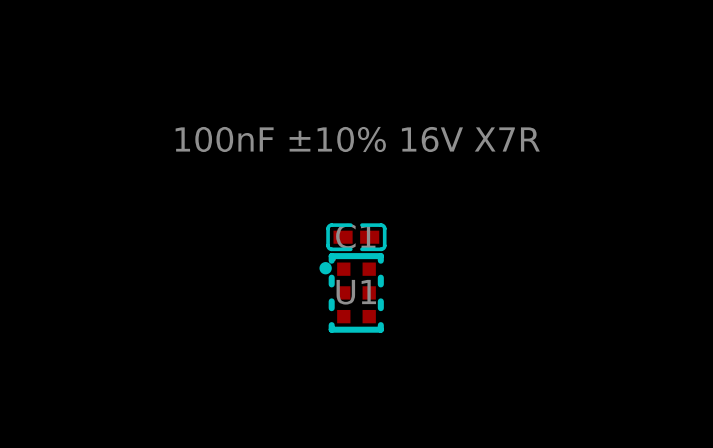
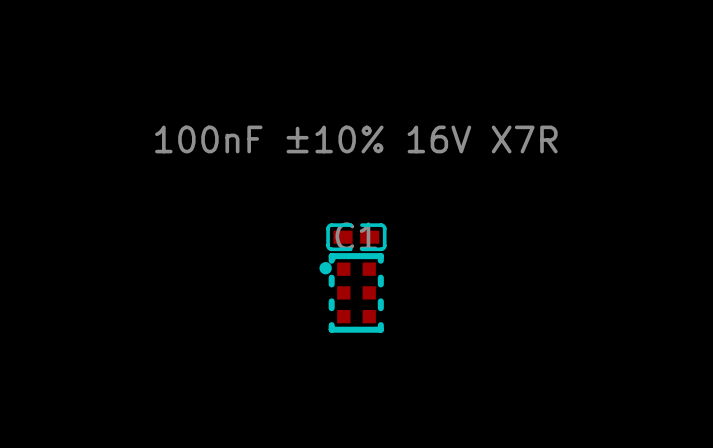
U1 name: U1 (356, 292) -> none

